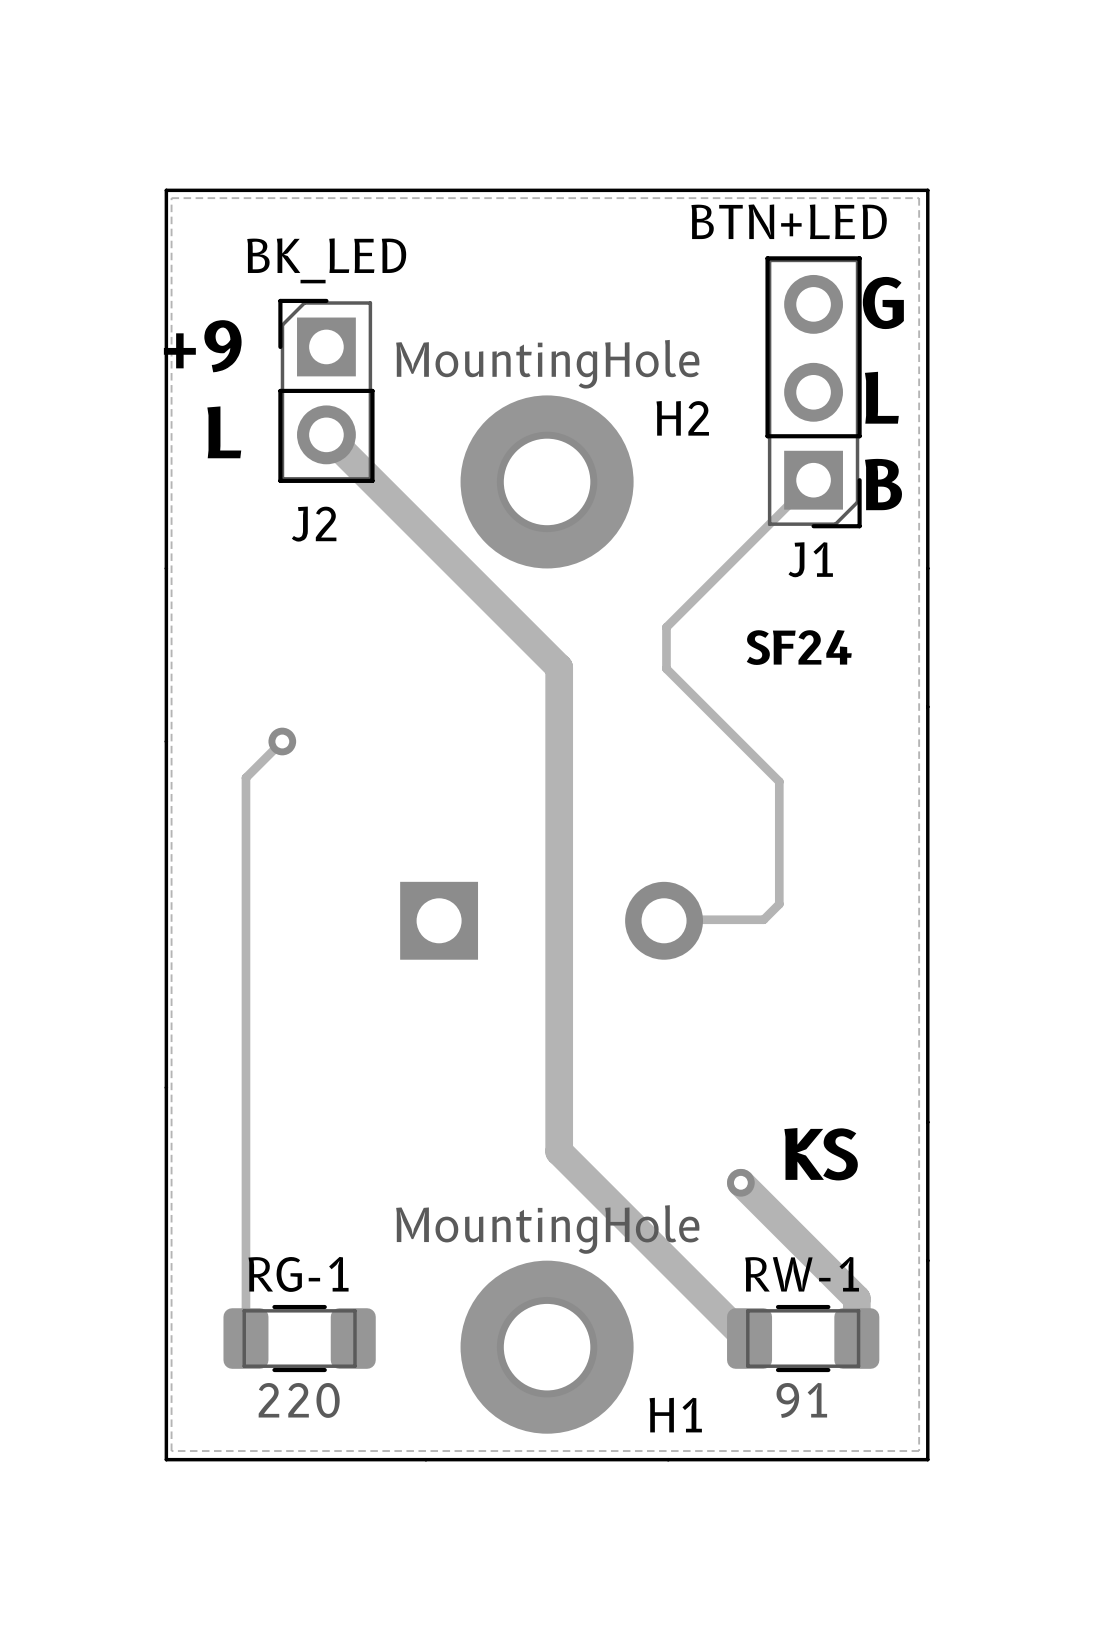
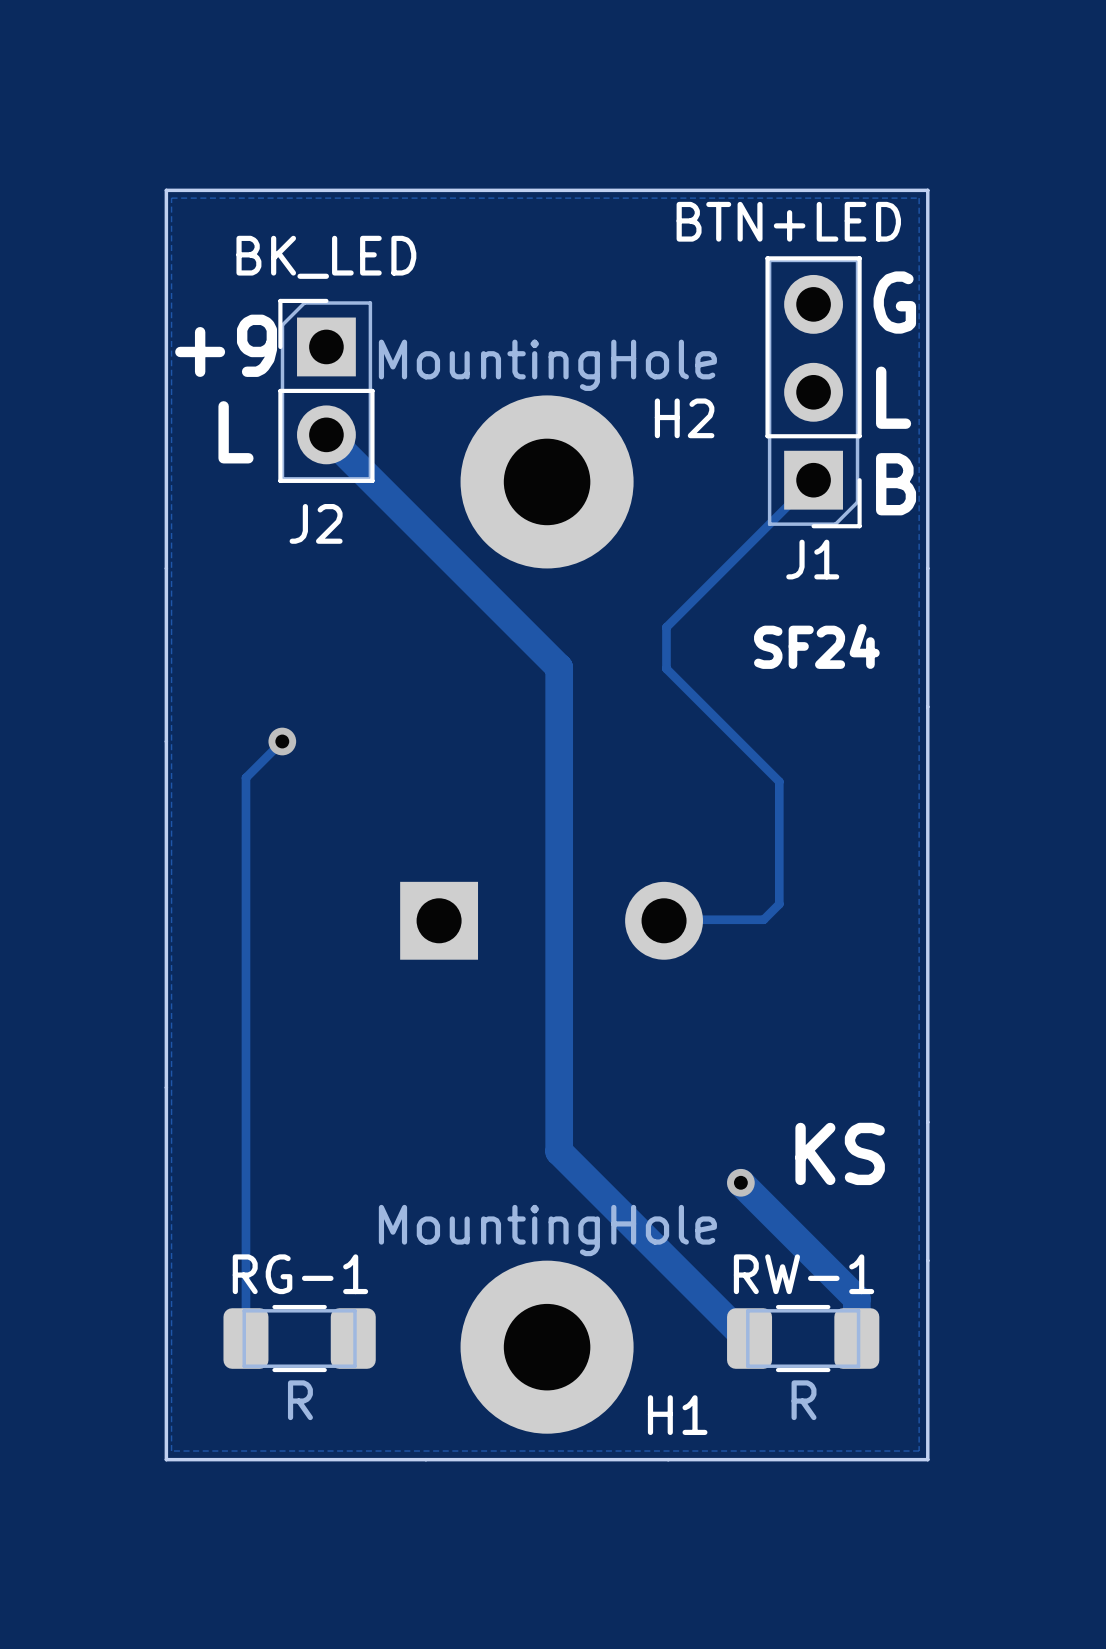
RG-1 value: 220 (299, 1400) -> R (300, 1400)
RW-1 value: 91 (801, 1400) -> R (804, 1400)

